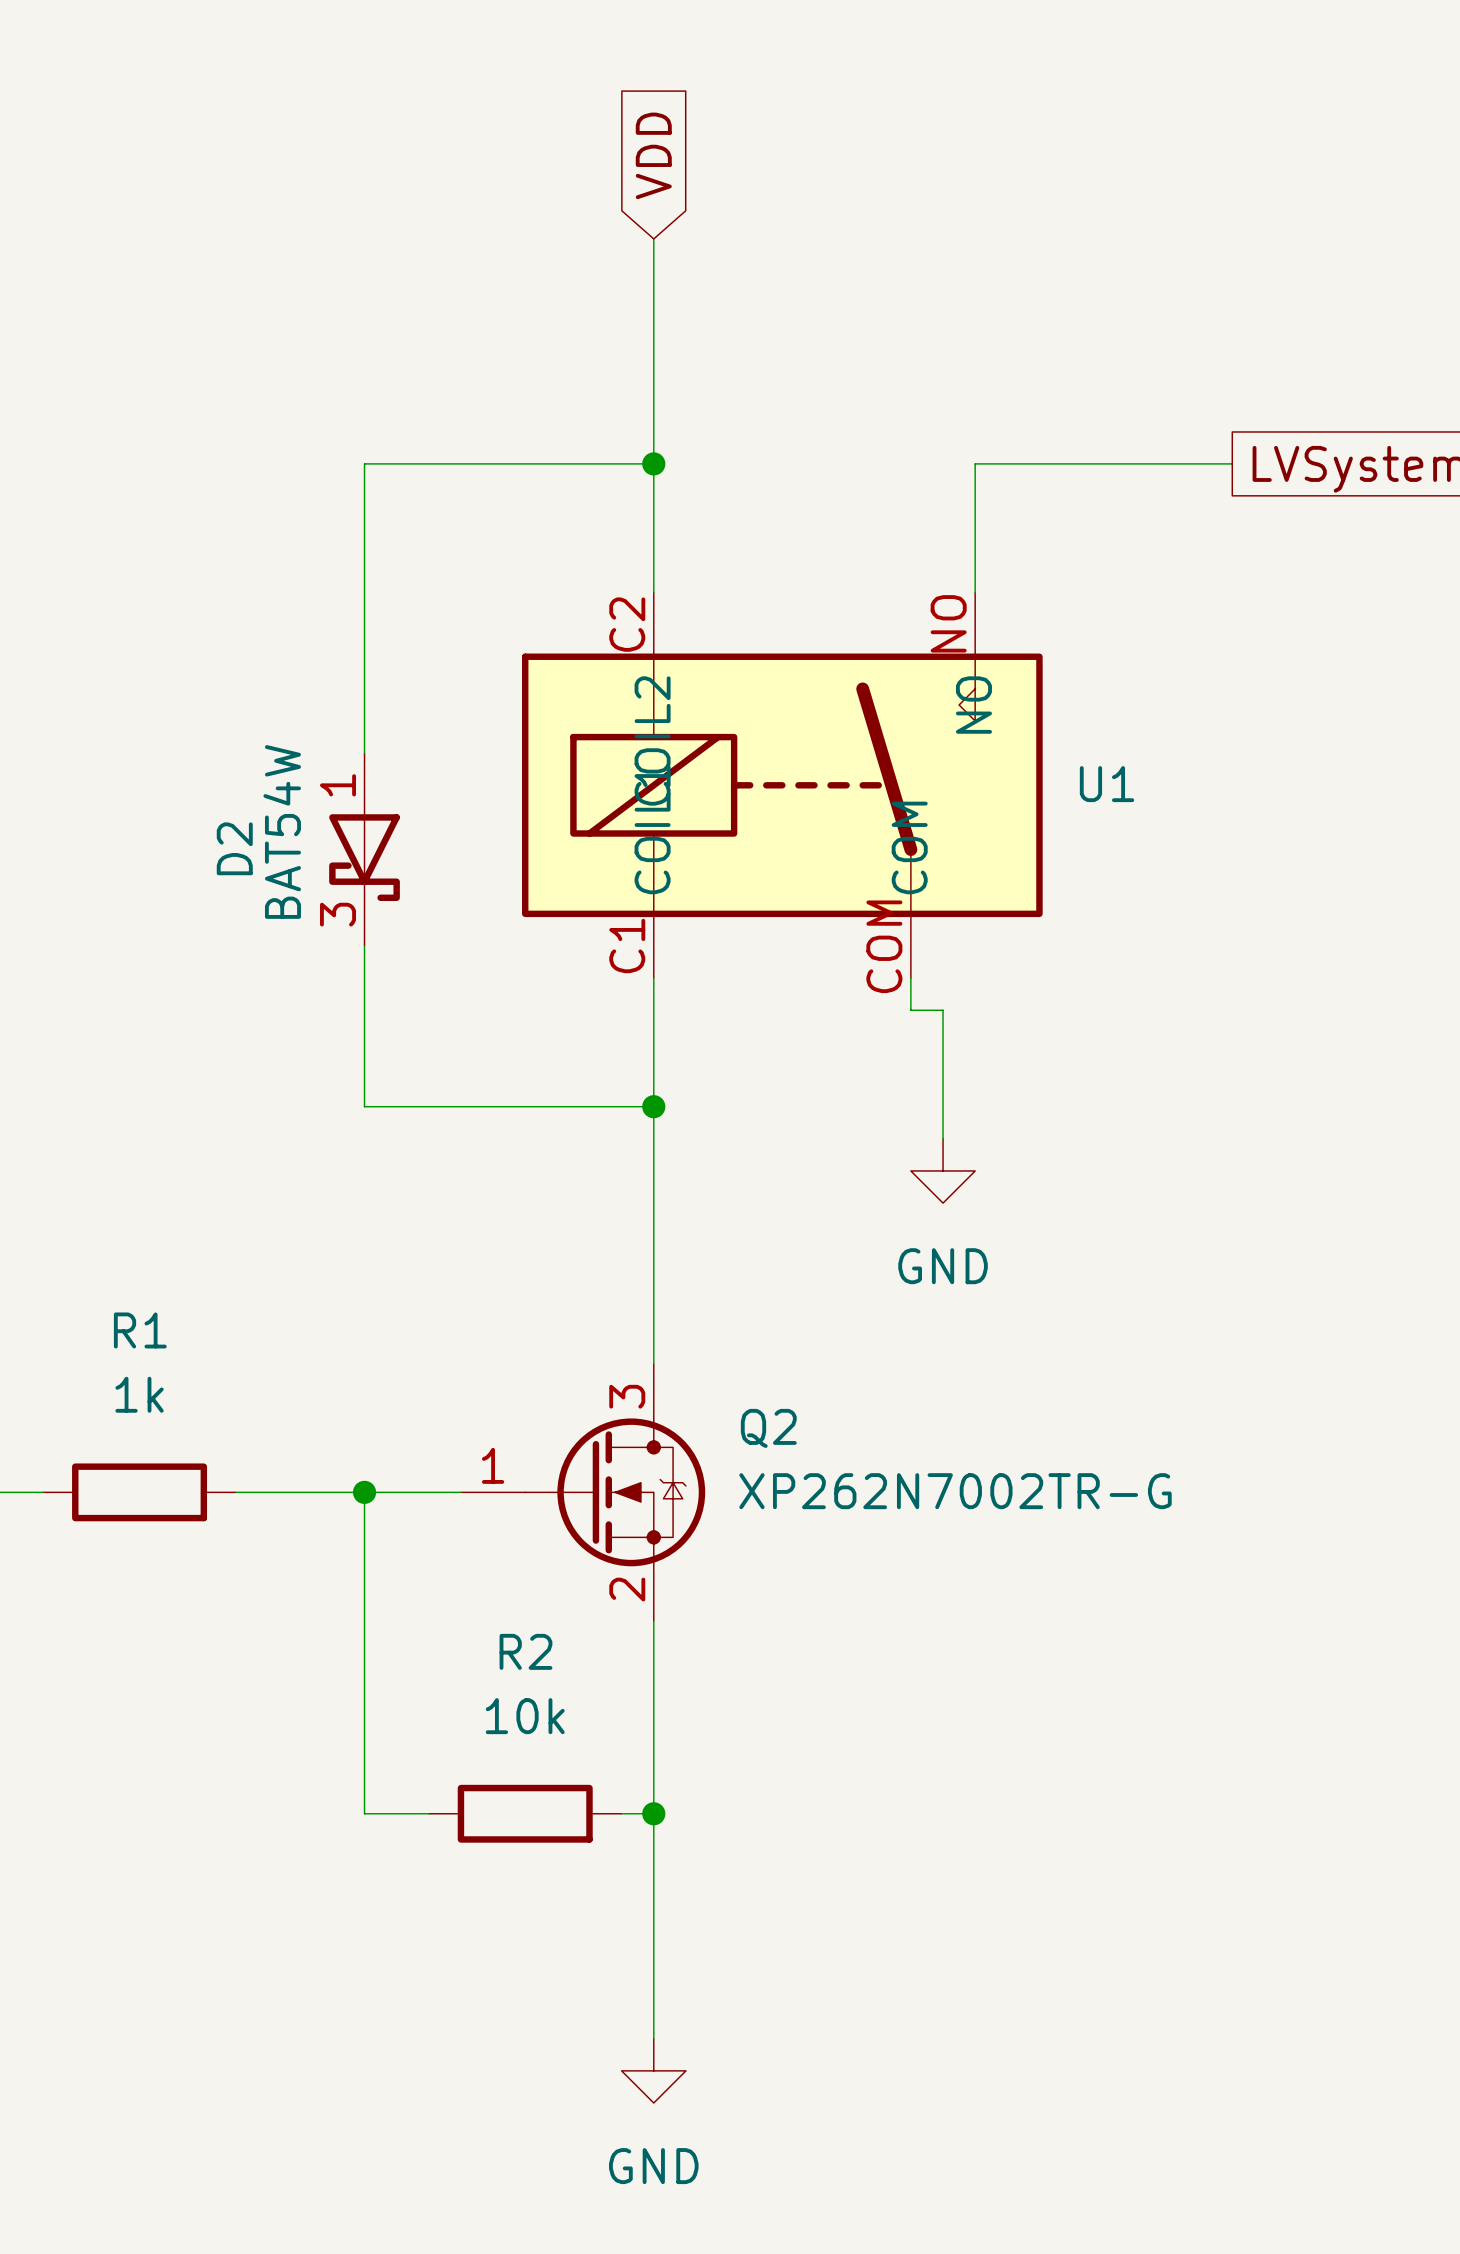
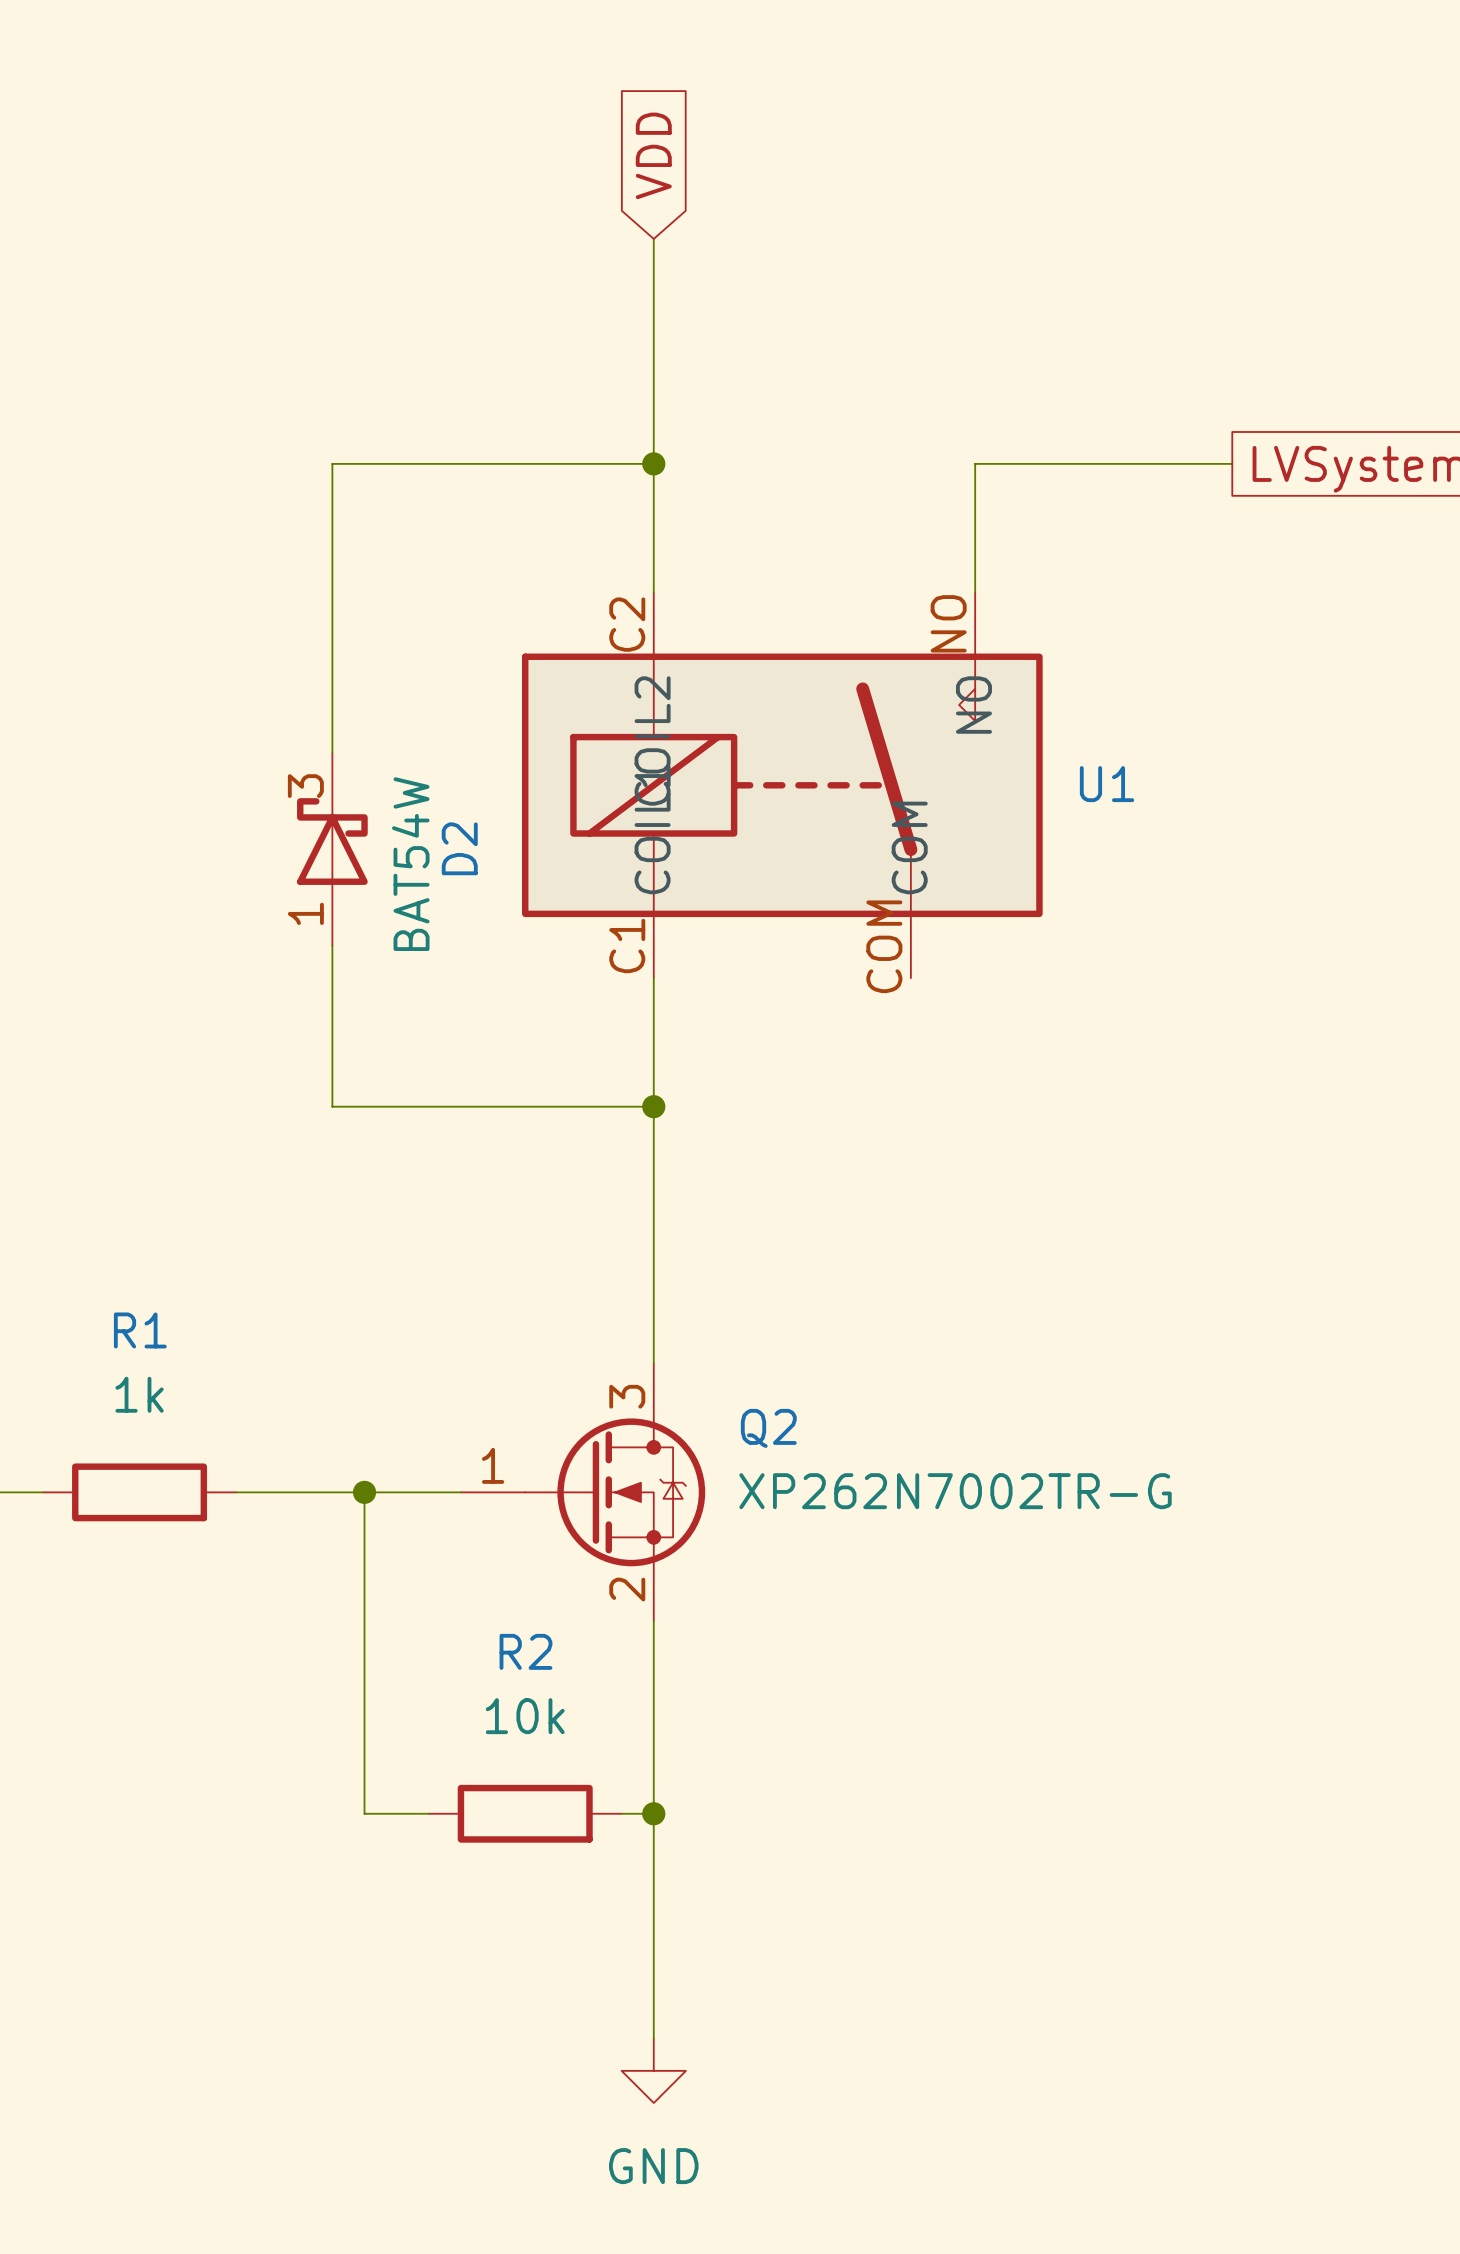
wire: (364, 463) (364, 753) -> (364, 463) (332, 463) (332, 753)
D2 rotation: 0° (364, 857) -> 180° (332, 841)
wire: (364, 946) (364, 1106) -> (332, 946) (332, 1106) (364, 1106)
wire: (910, 978) (910, 1010) (943, 1010) (943, 1138) -> none
power symbol: GND (943, 1170) -> none

